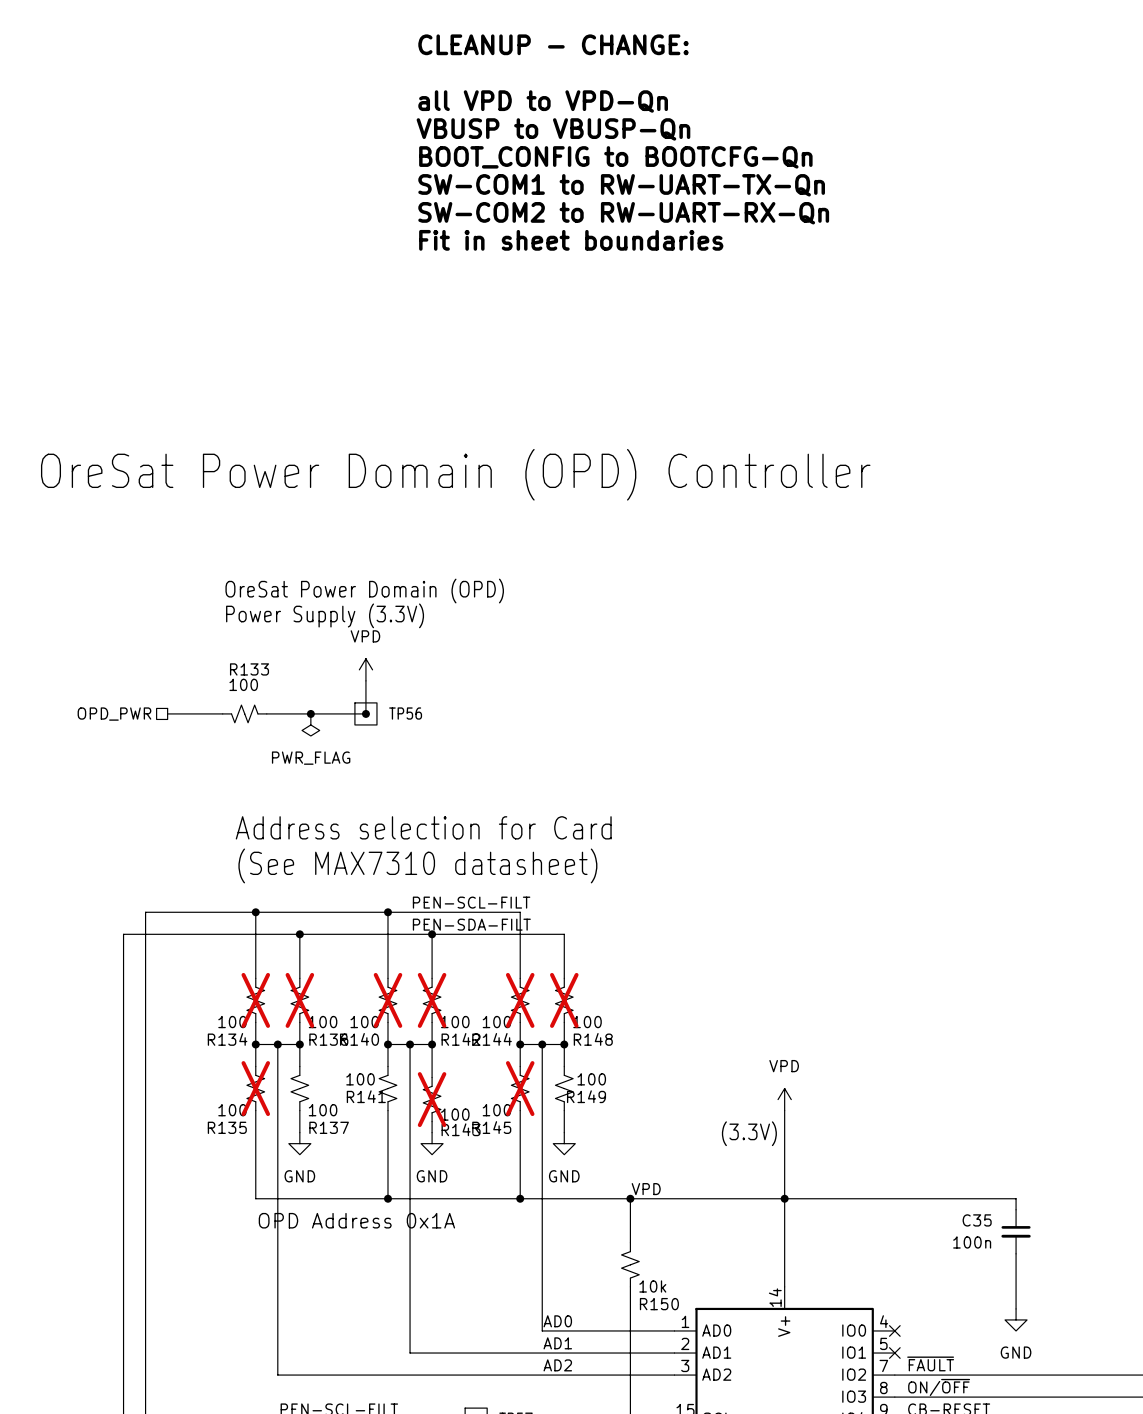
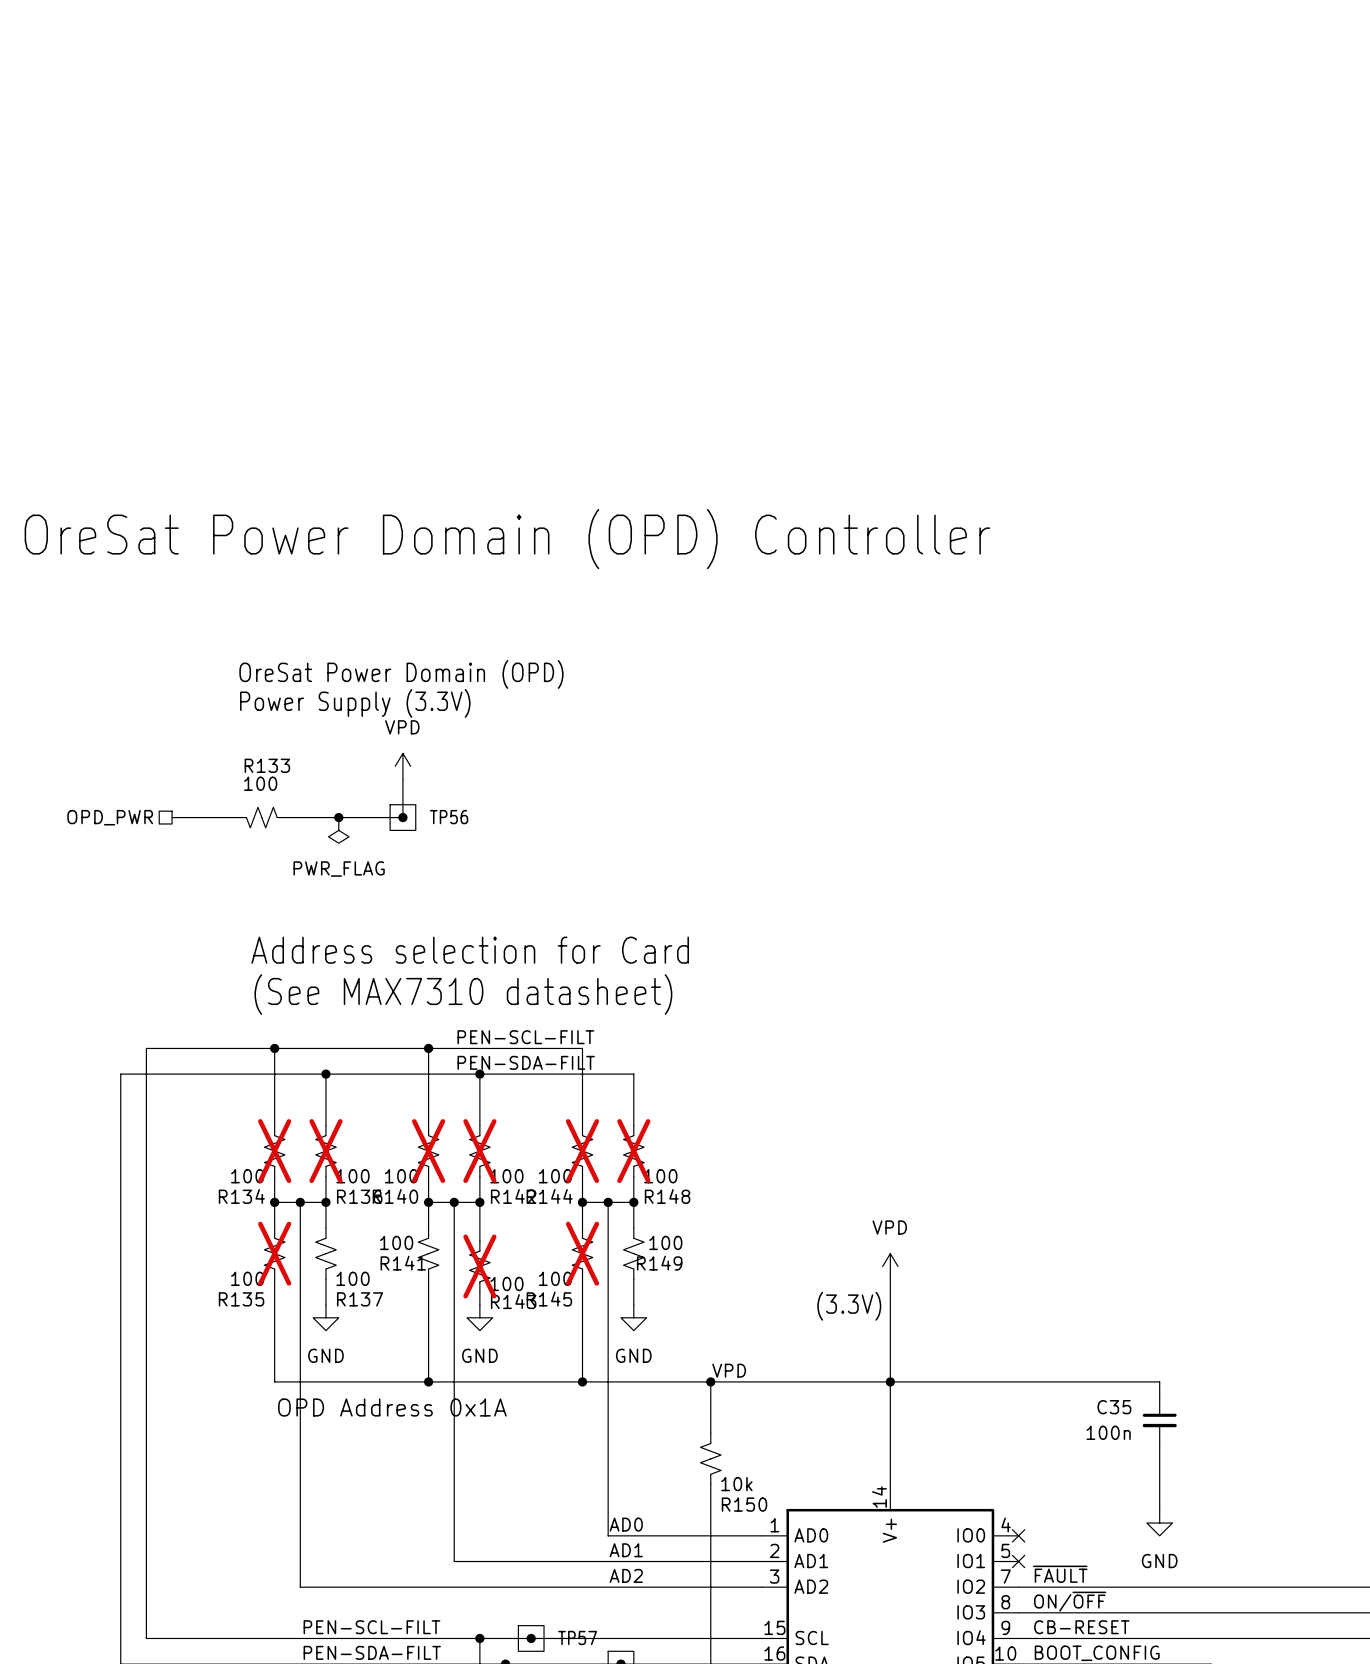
text: CLEANUP - CHANGE: (553, 44) -> none
text: all VPD to VPD-Qn (543, 101) -> none
text: VBUSP to VBUSP-Qn (553, 129) -> none
text: BOOT_CONFIG to BOOTCFG-Qn (615, 157) -> none
text: SW-COM1 to RW-UART-TX-Qn (621, 185) -> none
text: SW-COM2 to RW-UART-RX-Qn (623, 213) -> none
text: Fit in sheet boundaries (571, 240) -> none

